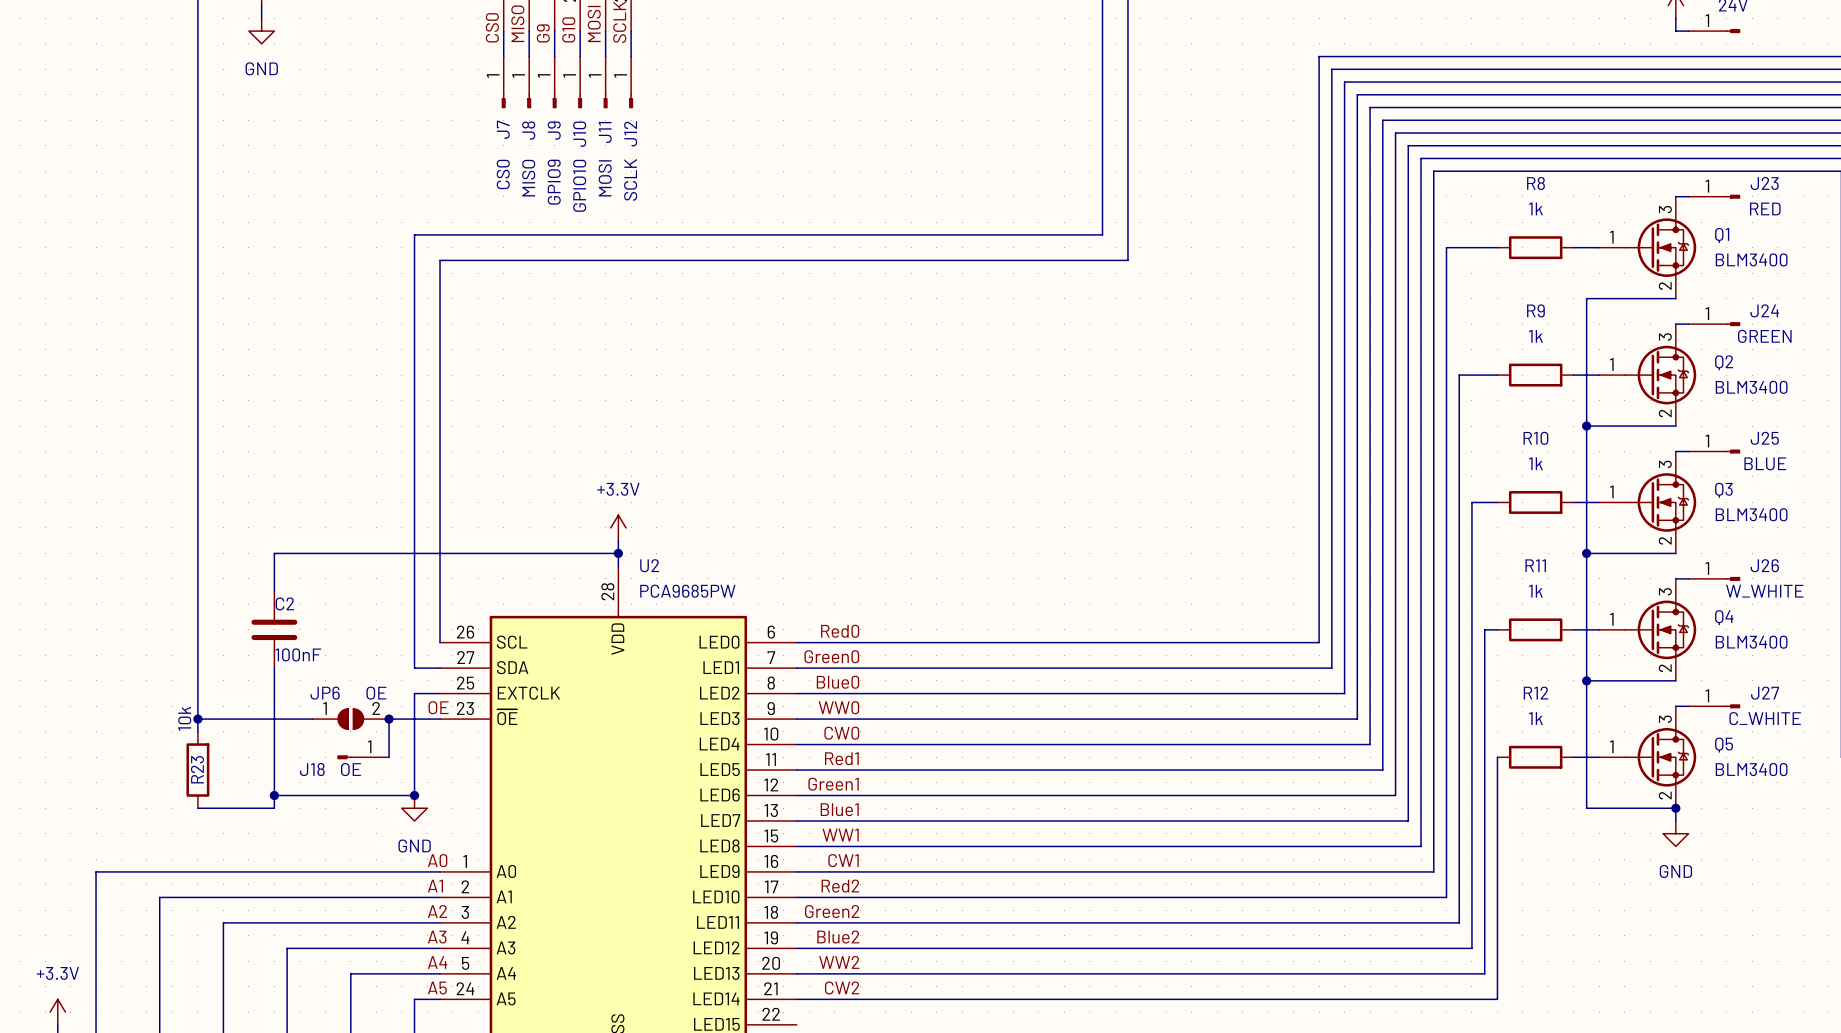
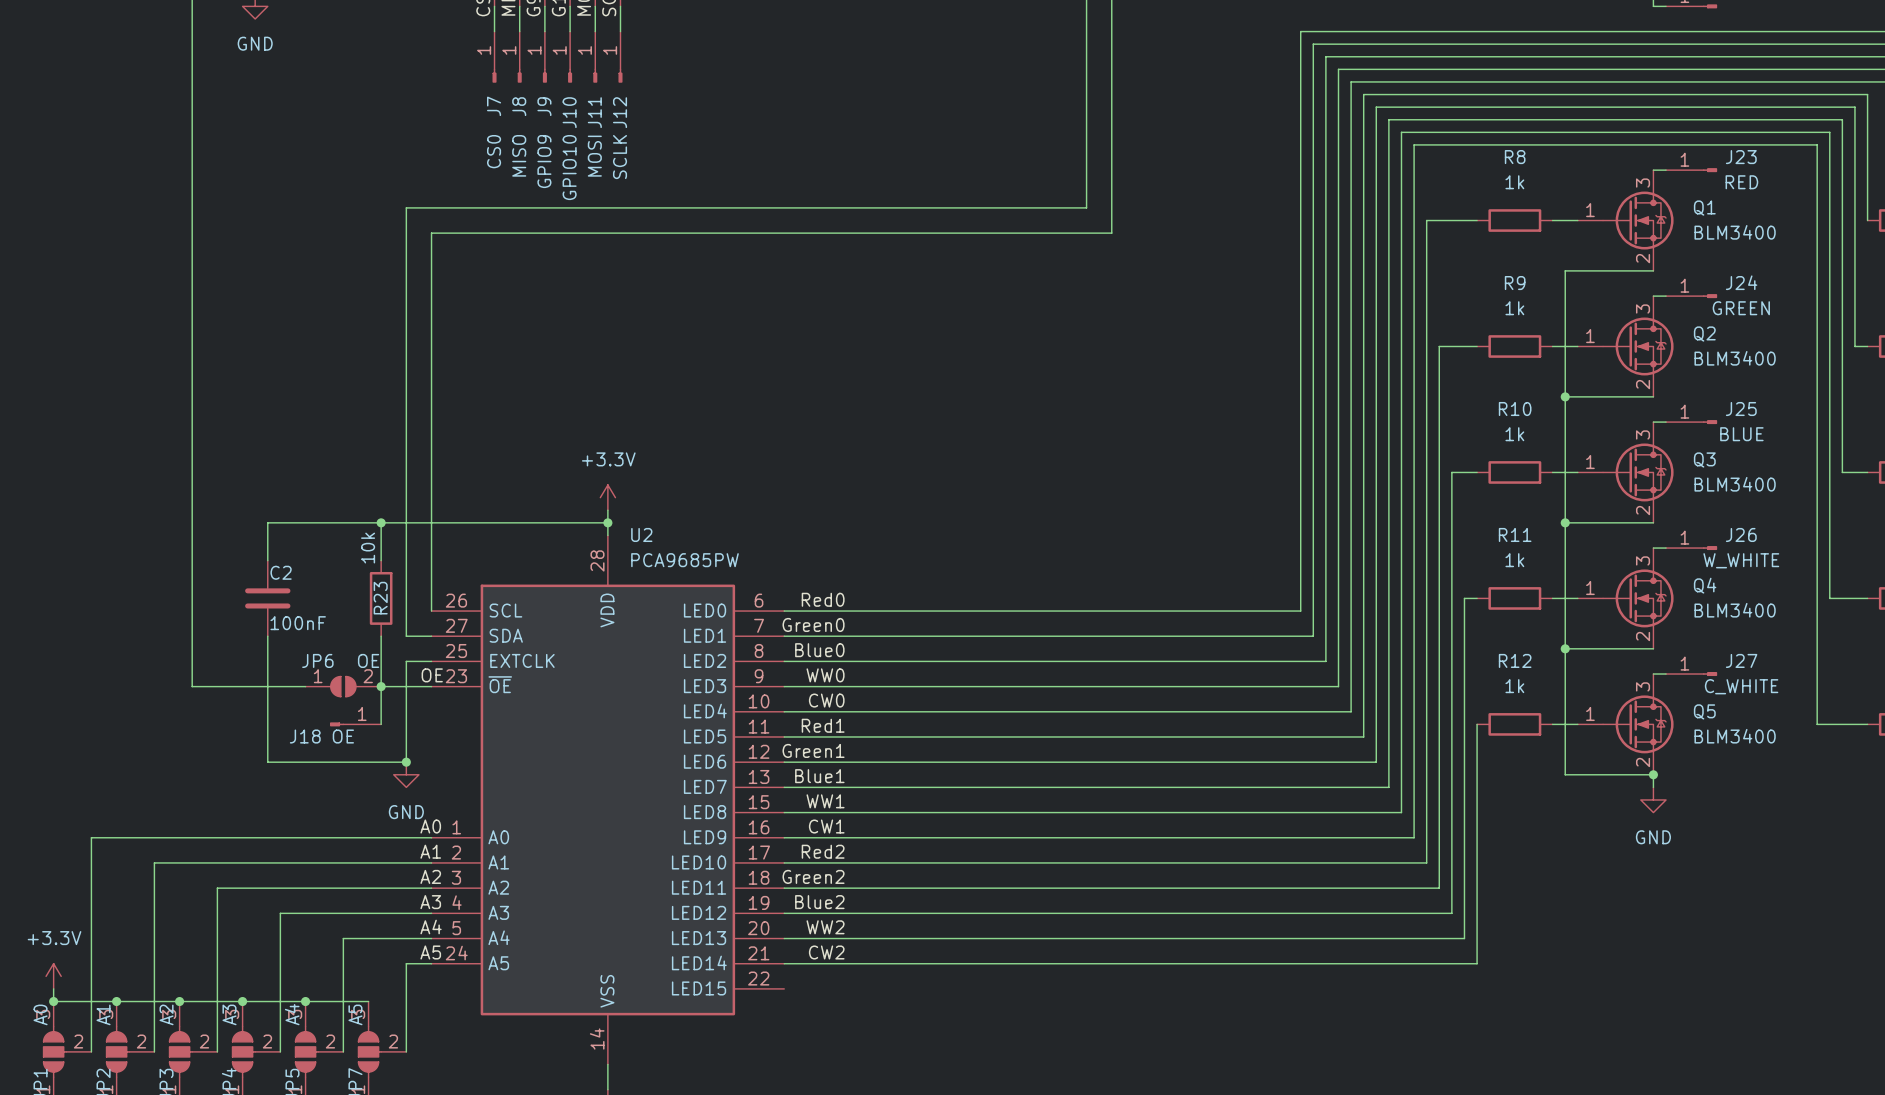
wire: none -> (381, 522) (381, 560)
junction: none -> (381, 522)
wire: none -> (381, 636) (381, 686)
wire: (197, 719) (197, 731) -> none
junction: (197, 719) -> none
R23 position: (197, 770) -> (381, 598)
wire: (274, 795) (274, 808) (197, 808) -> none
junction: (274, 795) -> none

